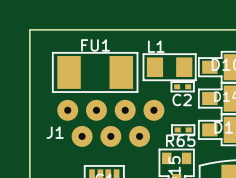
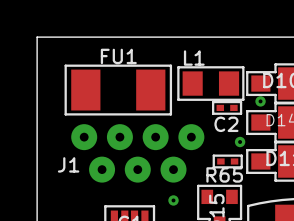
part: none -> (260, 101)
part: none -> (240, 142)
part: none -> (173, 200)

